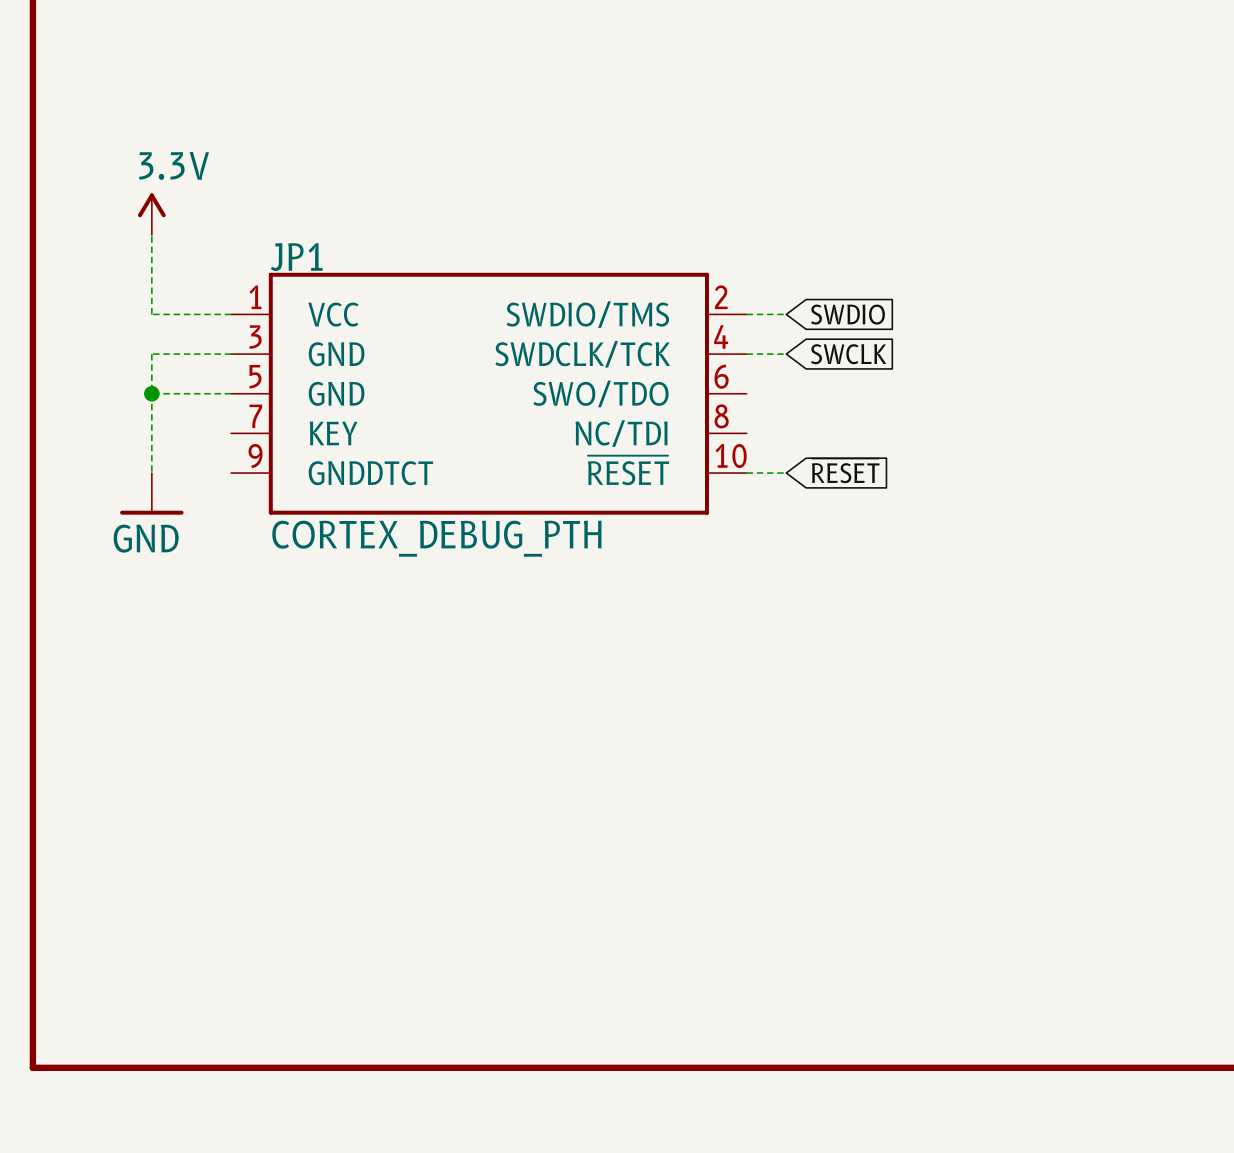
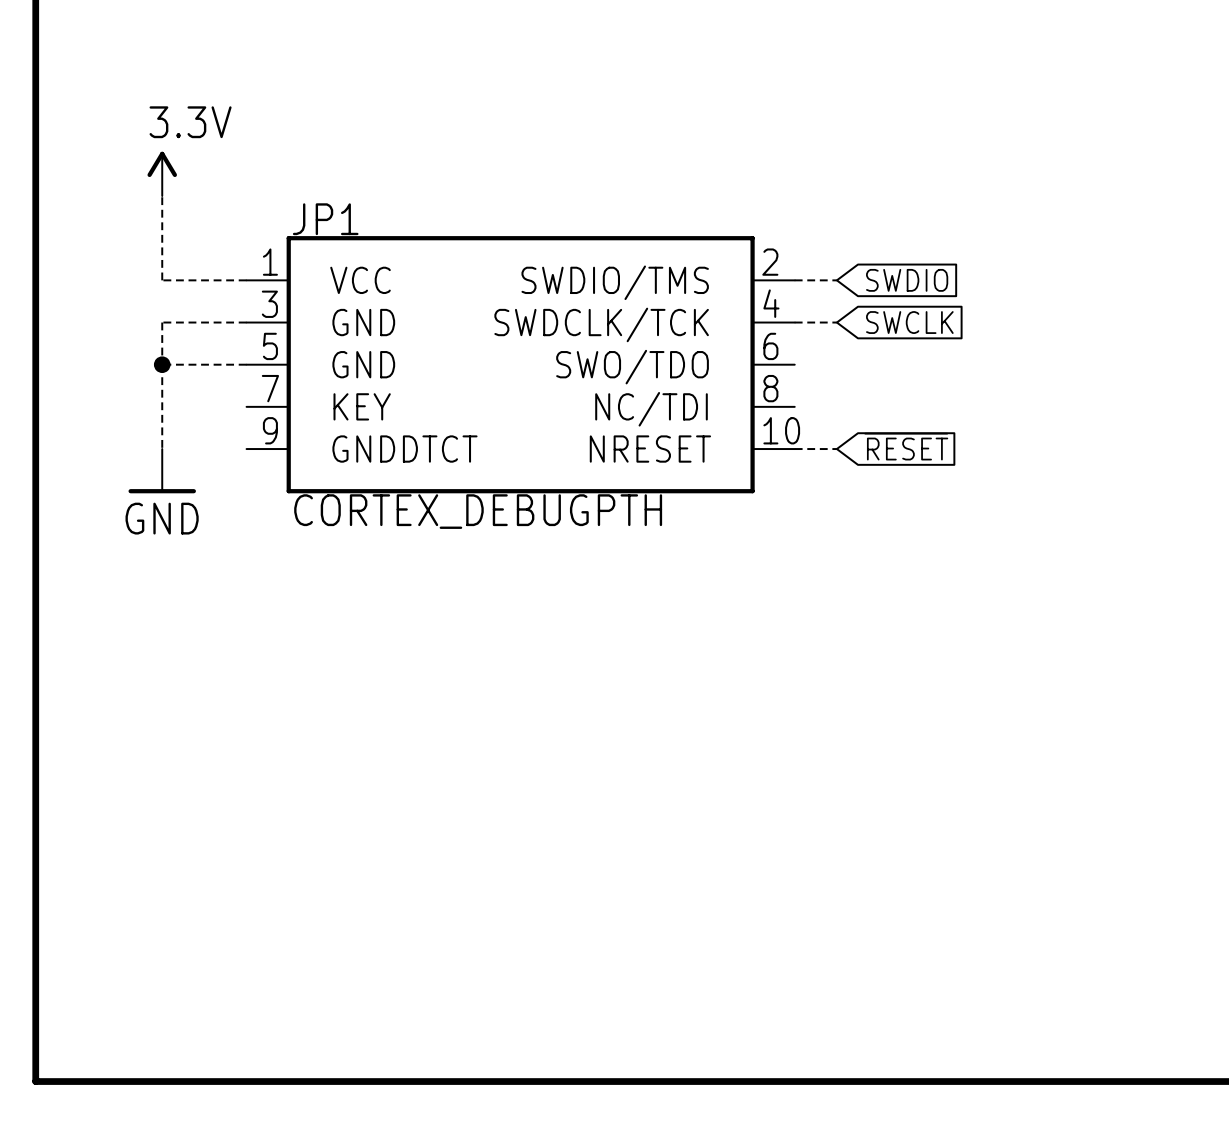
JP1 pin name: ~{RESET} (628, 470) -> NRESET (650, 449)
JP1 value: CORTEX_DEBUG_PTH (436, 538) -> CORTEX_DEBUGPTH (478, 511)

